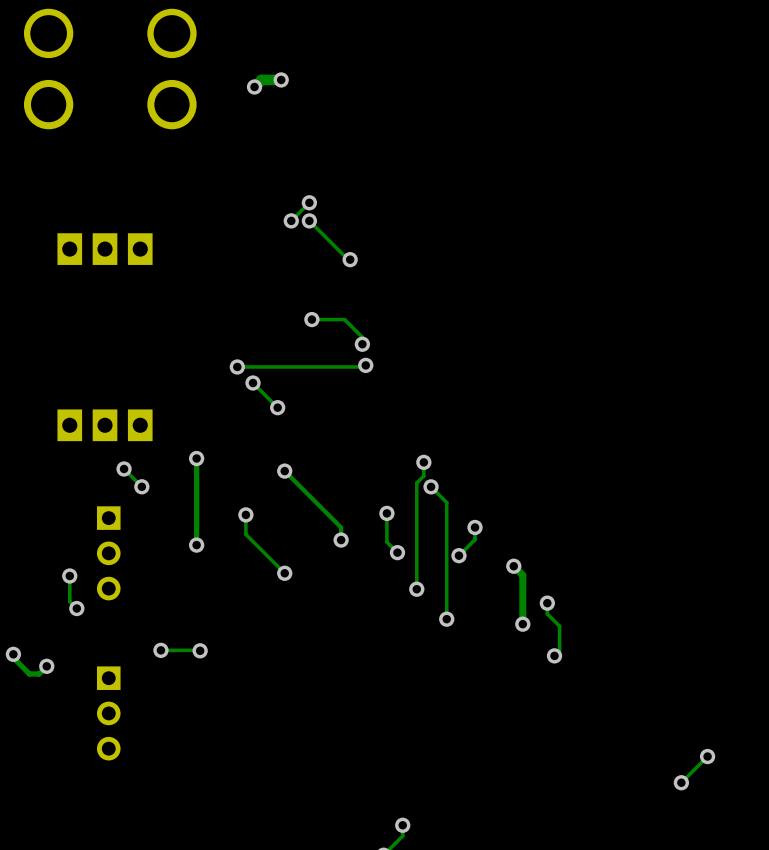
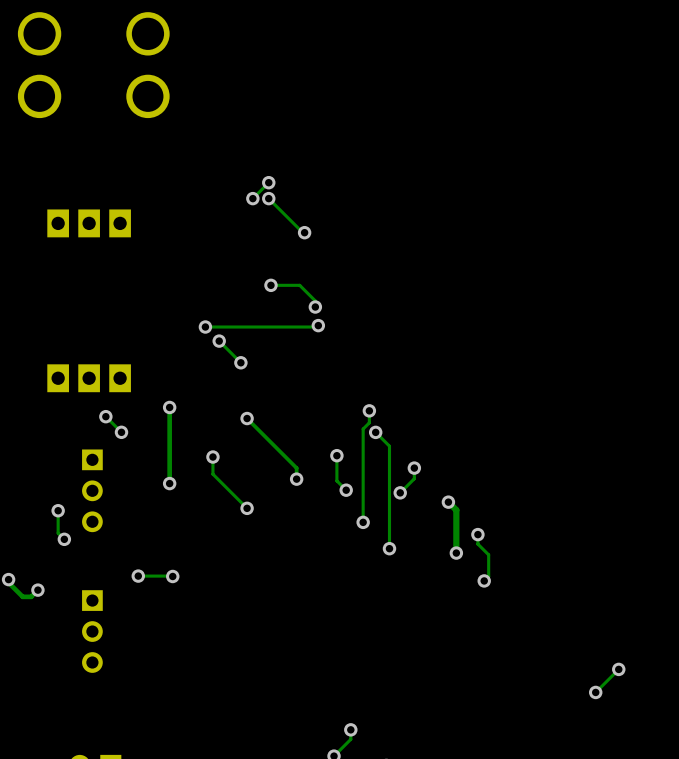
track: (281, 79) (261, 79) (254, 87) -> none
via: (281, 79) -> none
via: (254, 87) -> none

